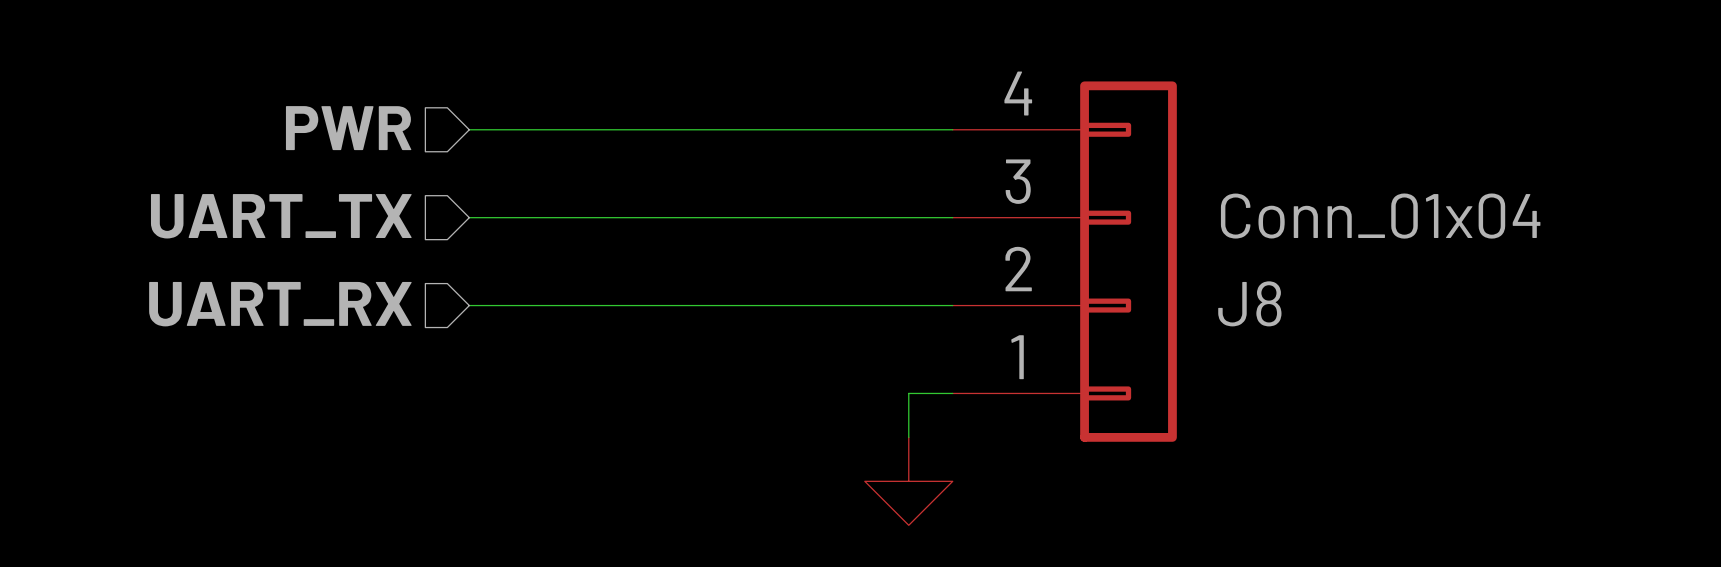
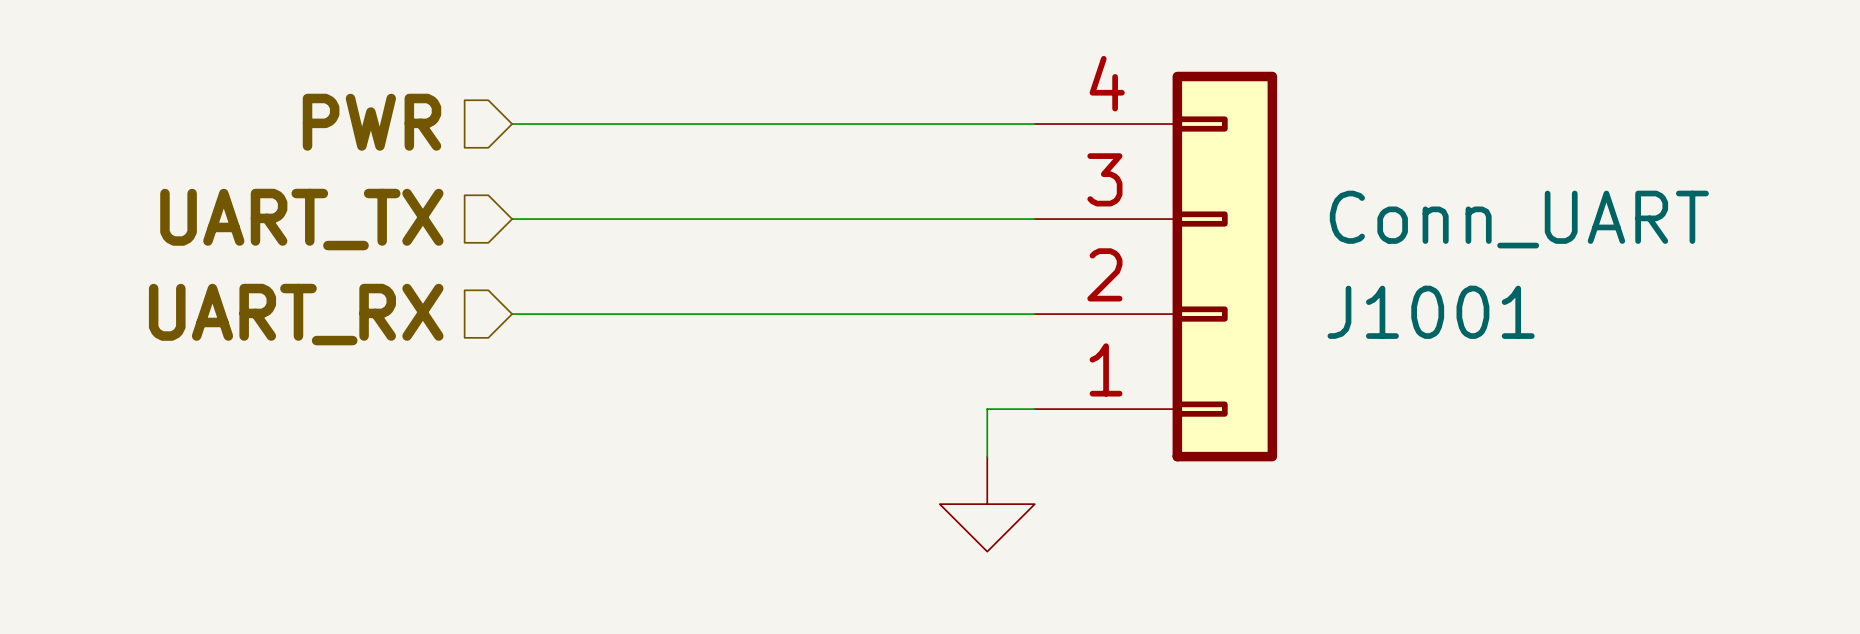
J8 value: Conn_01x04 (1380, 216) -> Conn_UART (1519, 219)
J8 name: J8 (1249, 303) -> J1001 (1431, 312)

